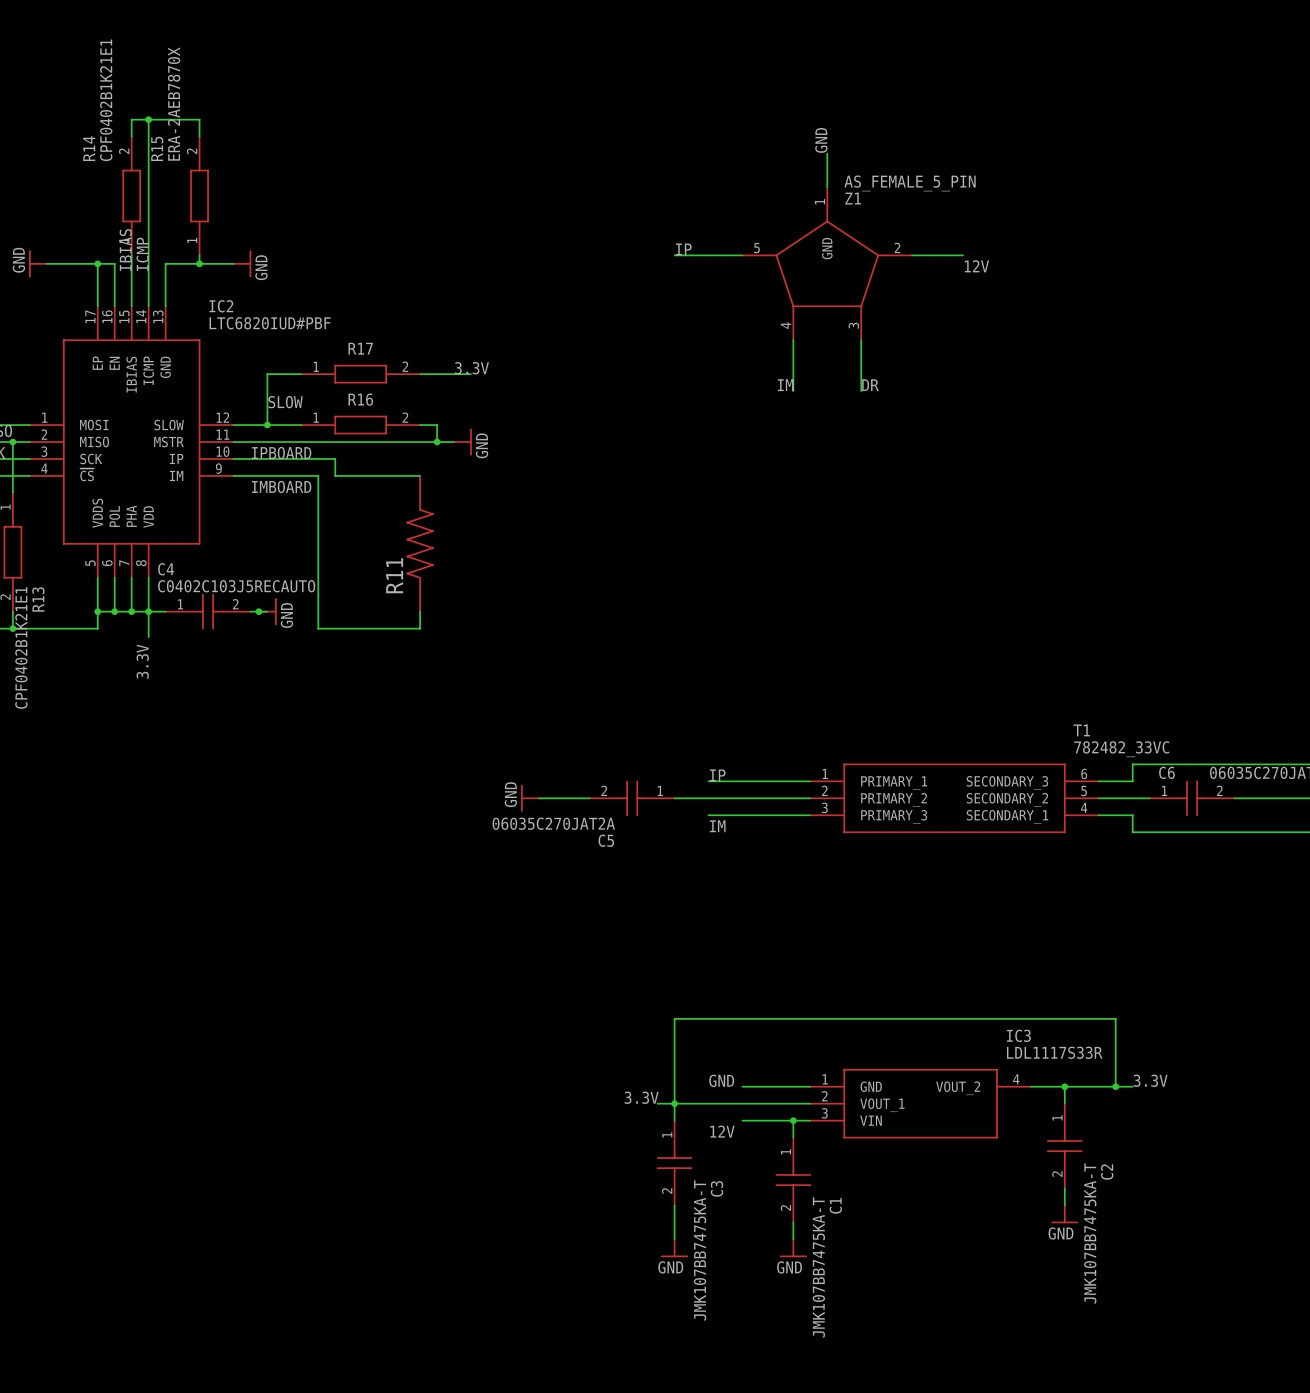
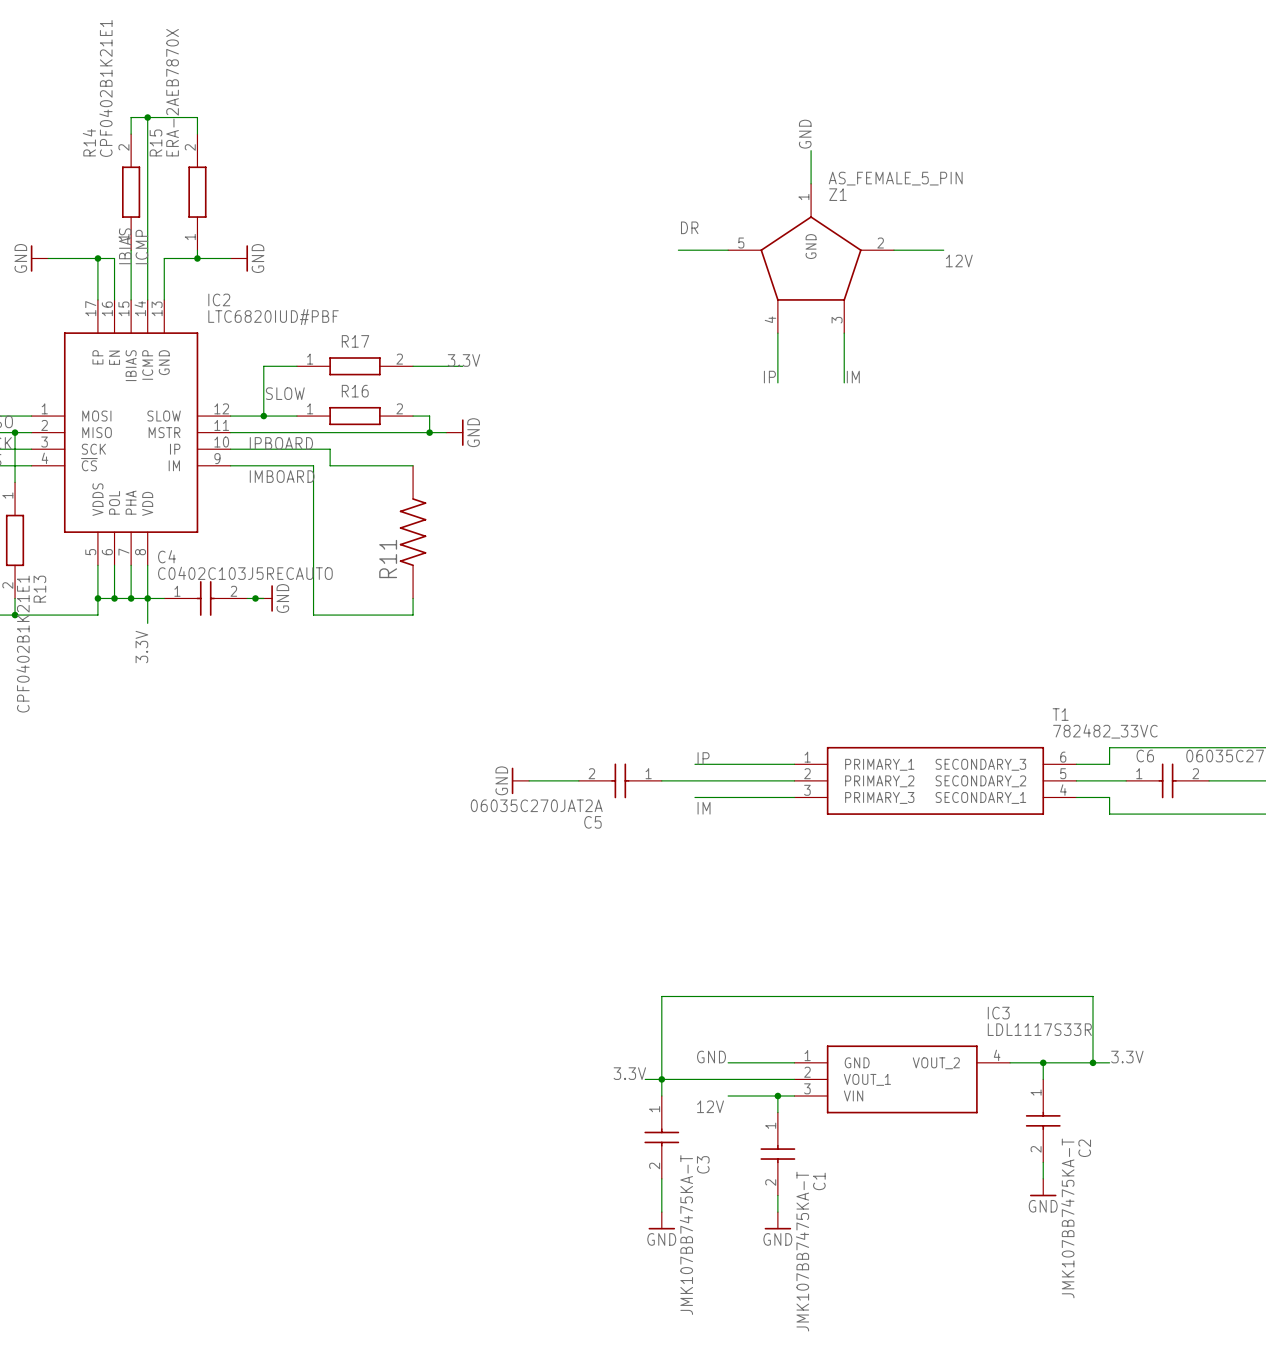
label: none -> DR (689, 227)
label: IP (683, 249) -> none
wire: (674, 255) (691, 255) -> none
label: IM (785, 385) -> IP (769, 377)
label: DR (870, 385) -> IM (853, 377)

